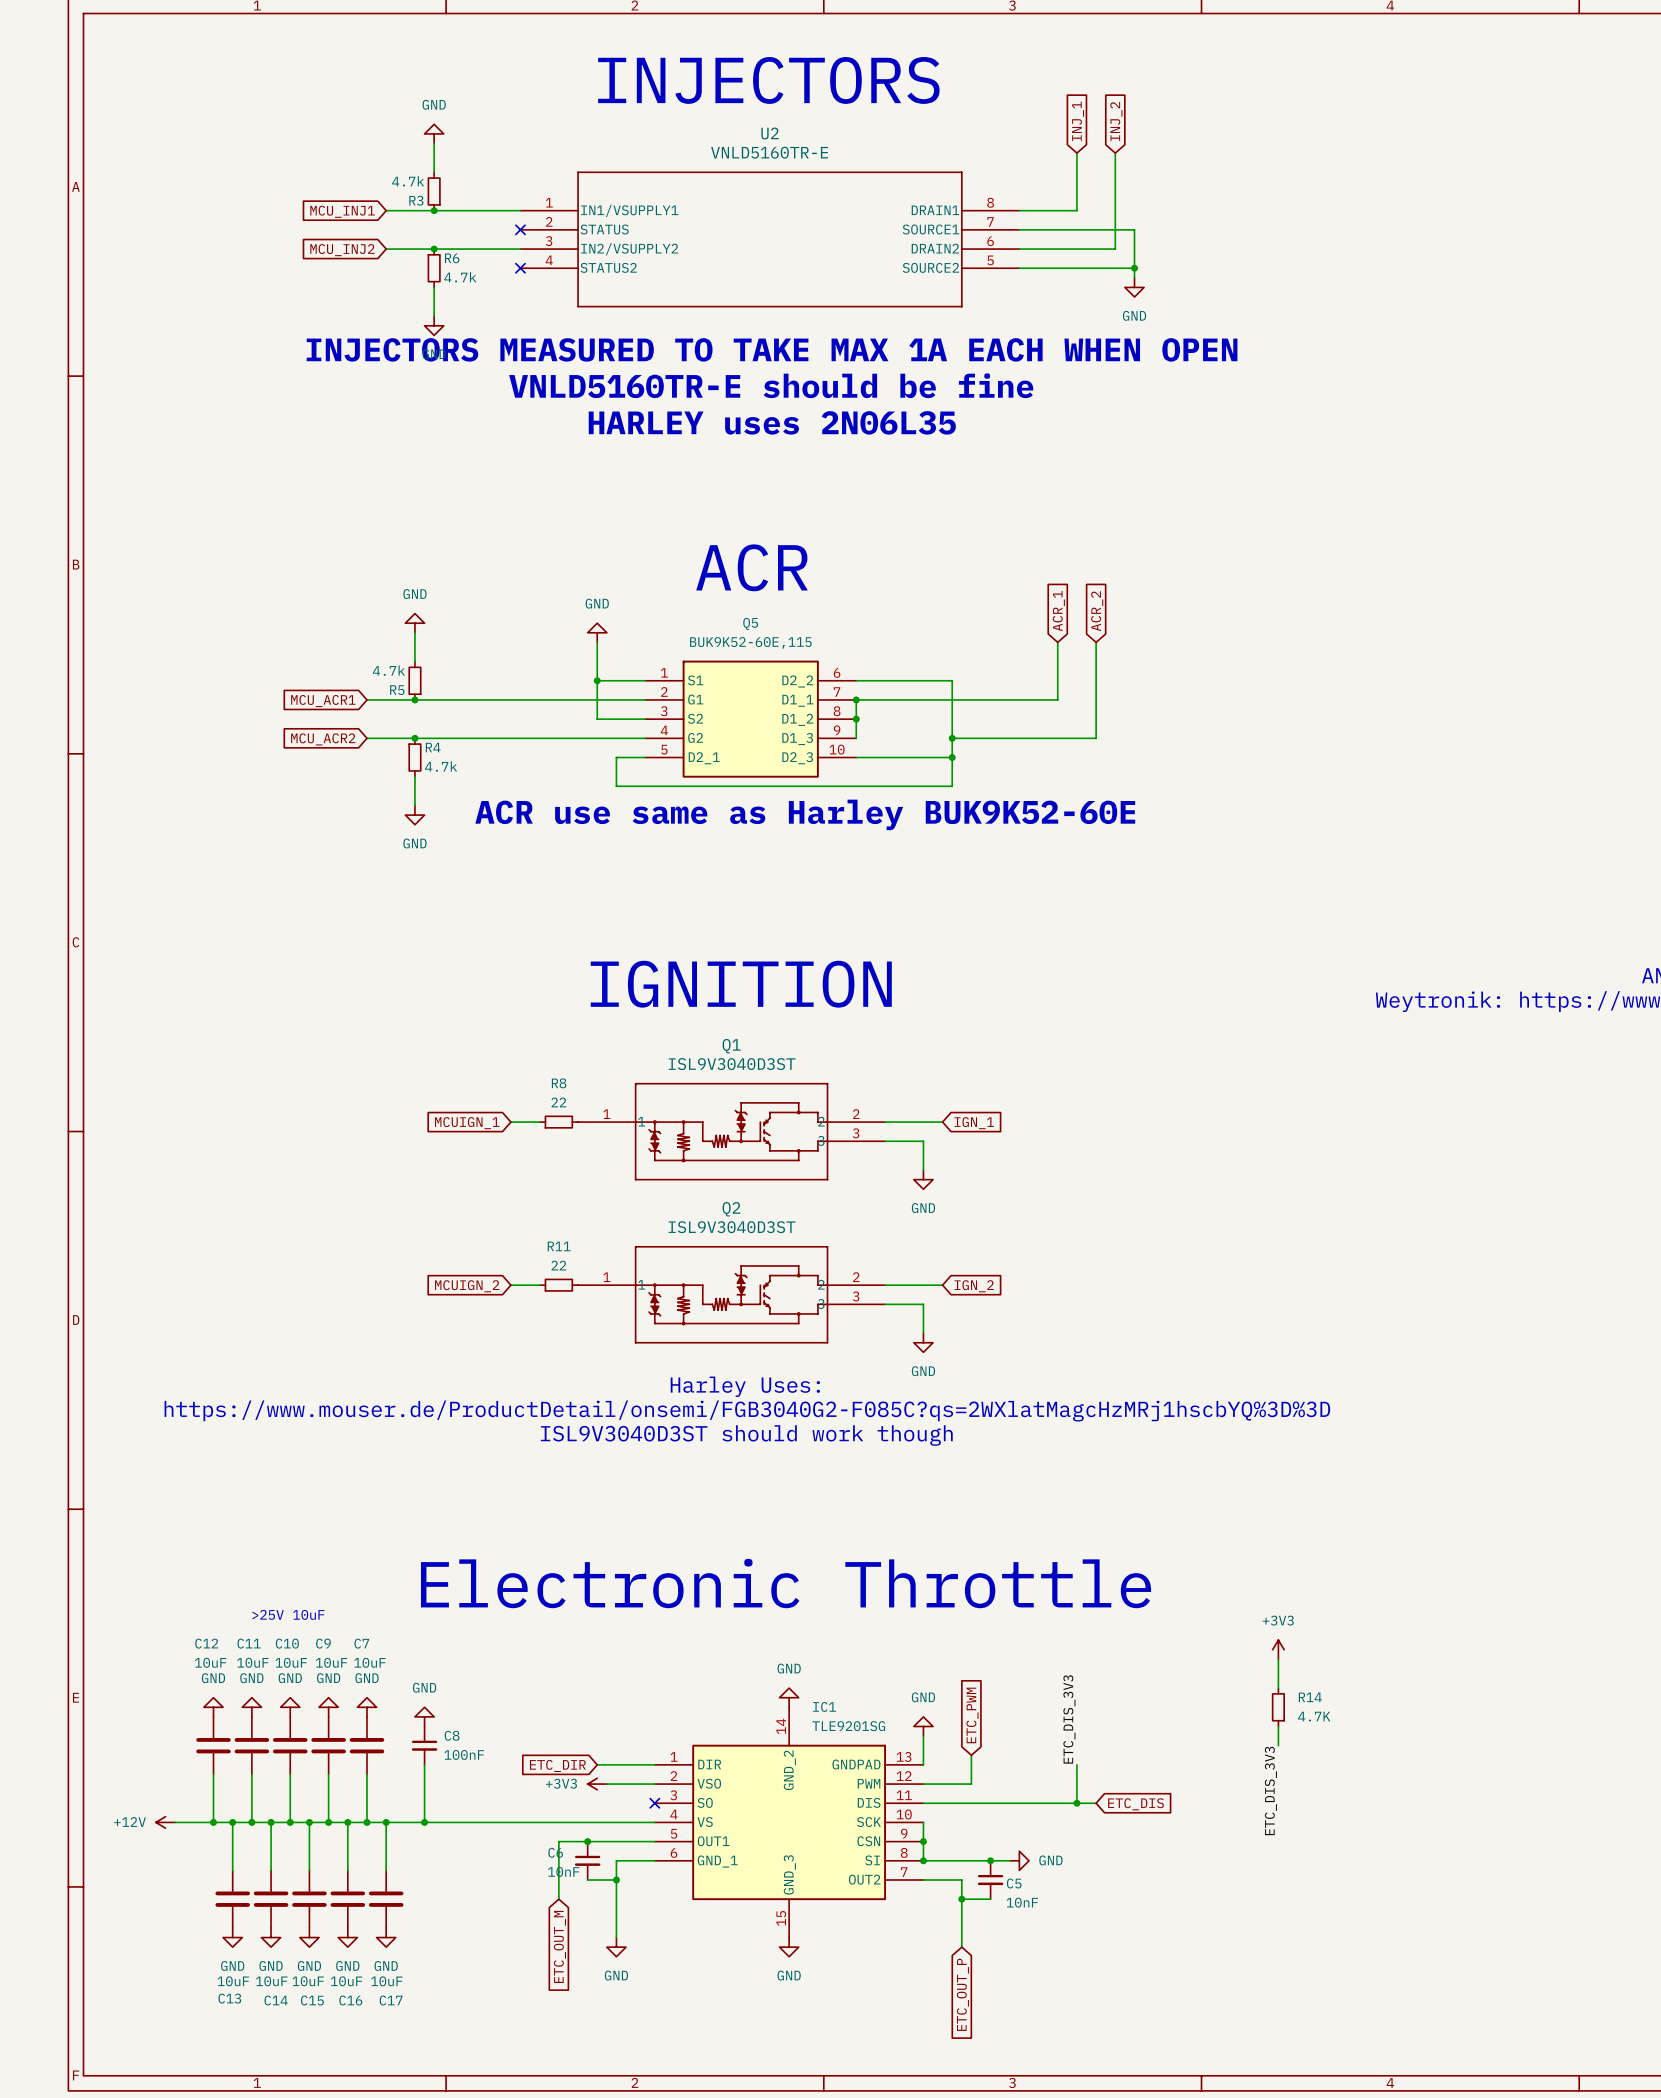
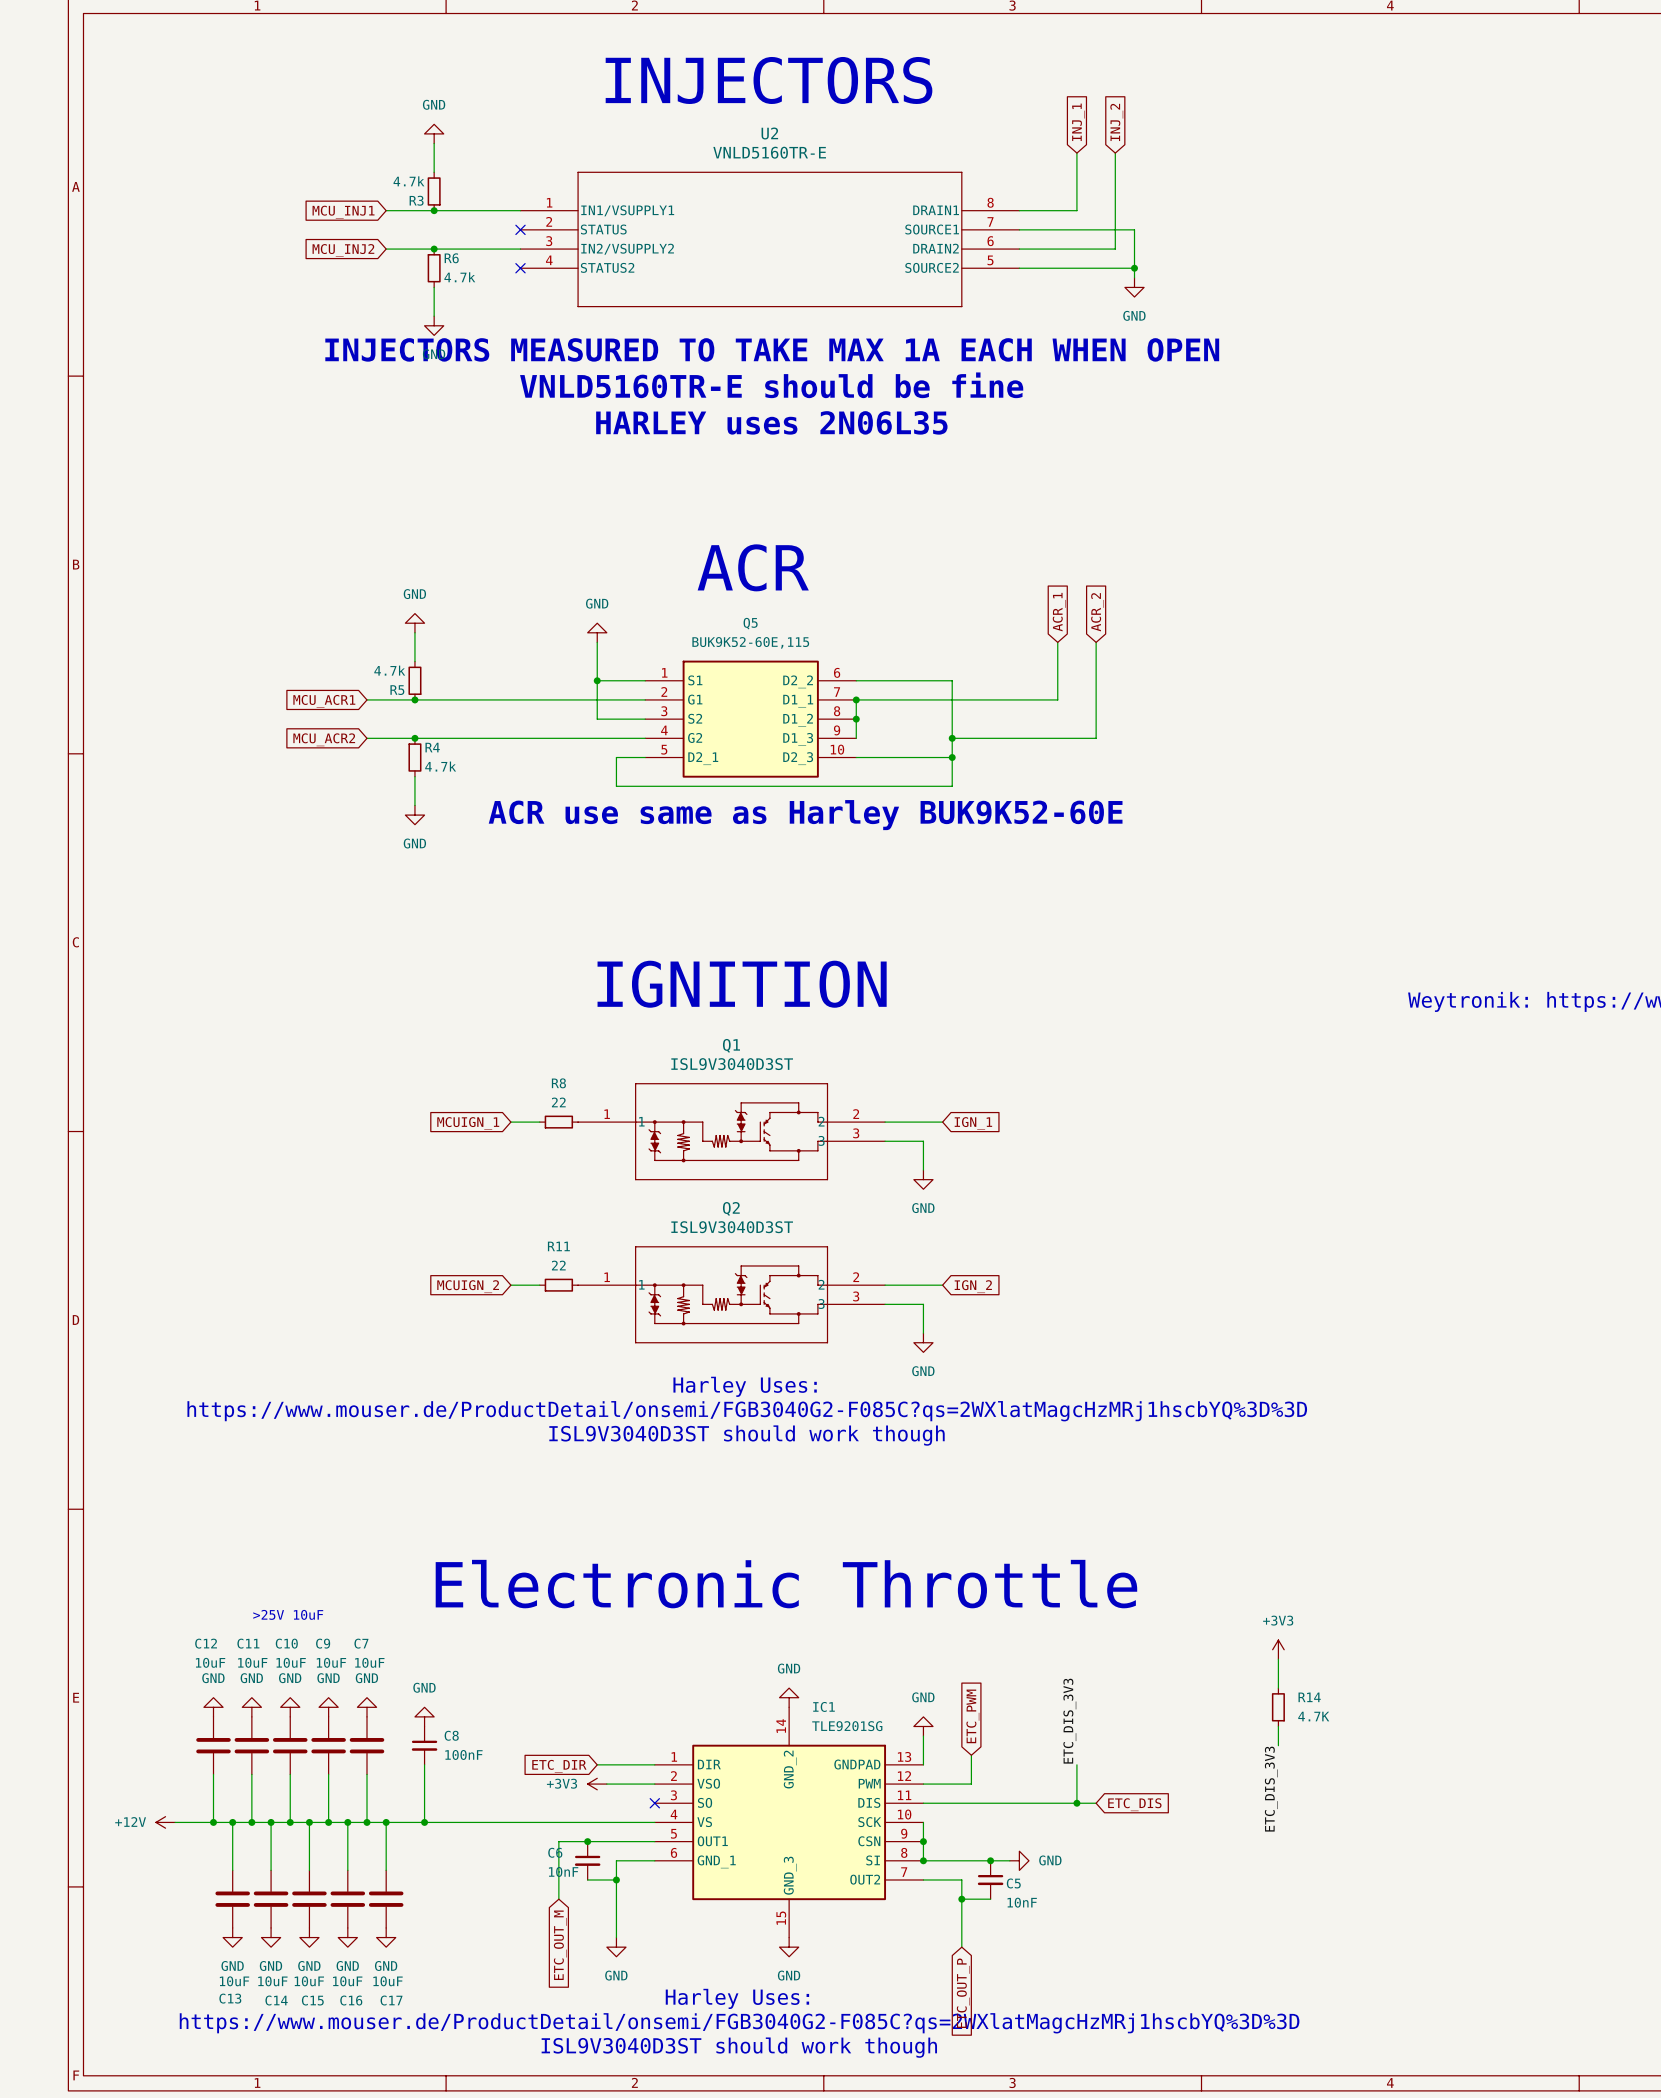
text: none -> Harley Uses: (737, 1998)
text: none -> https://www.mouser.de/ProductDetail/onsemi/FGB3040G2-F085C?qs=2WXlatMagcHzMRj1hscbYQ%3D%3D (739, 2023)
text: none -> ISL9V3040D3ST should work though (739, 2047)

